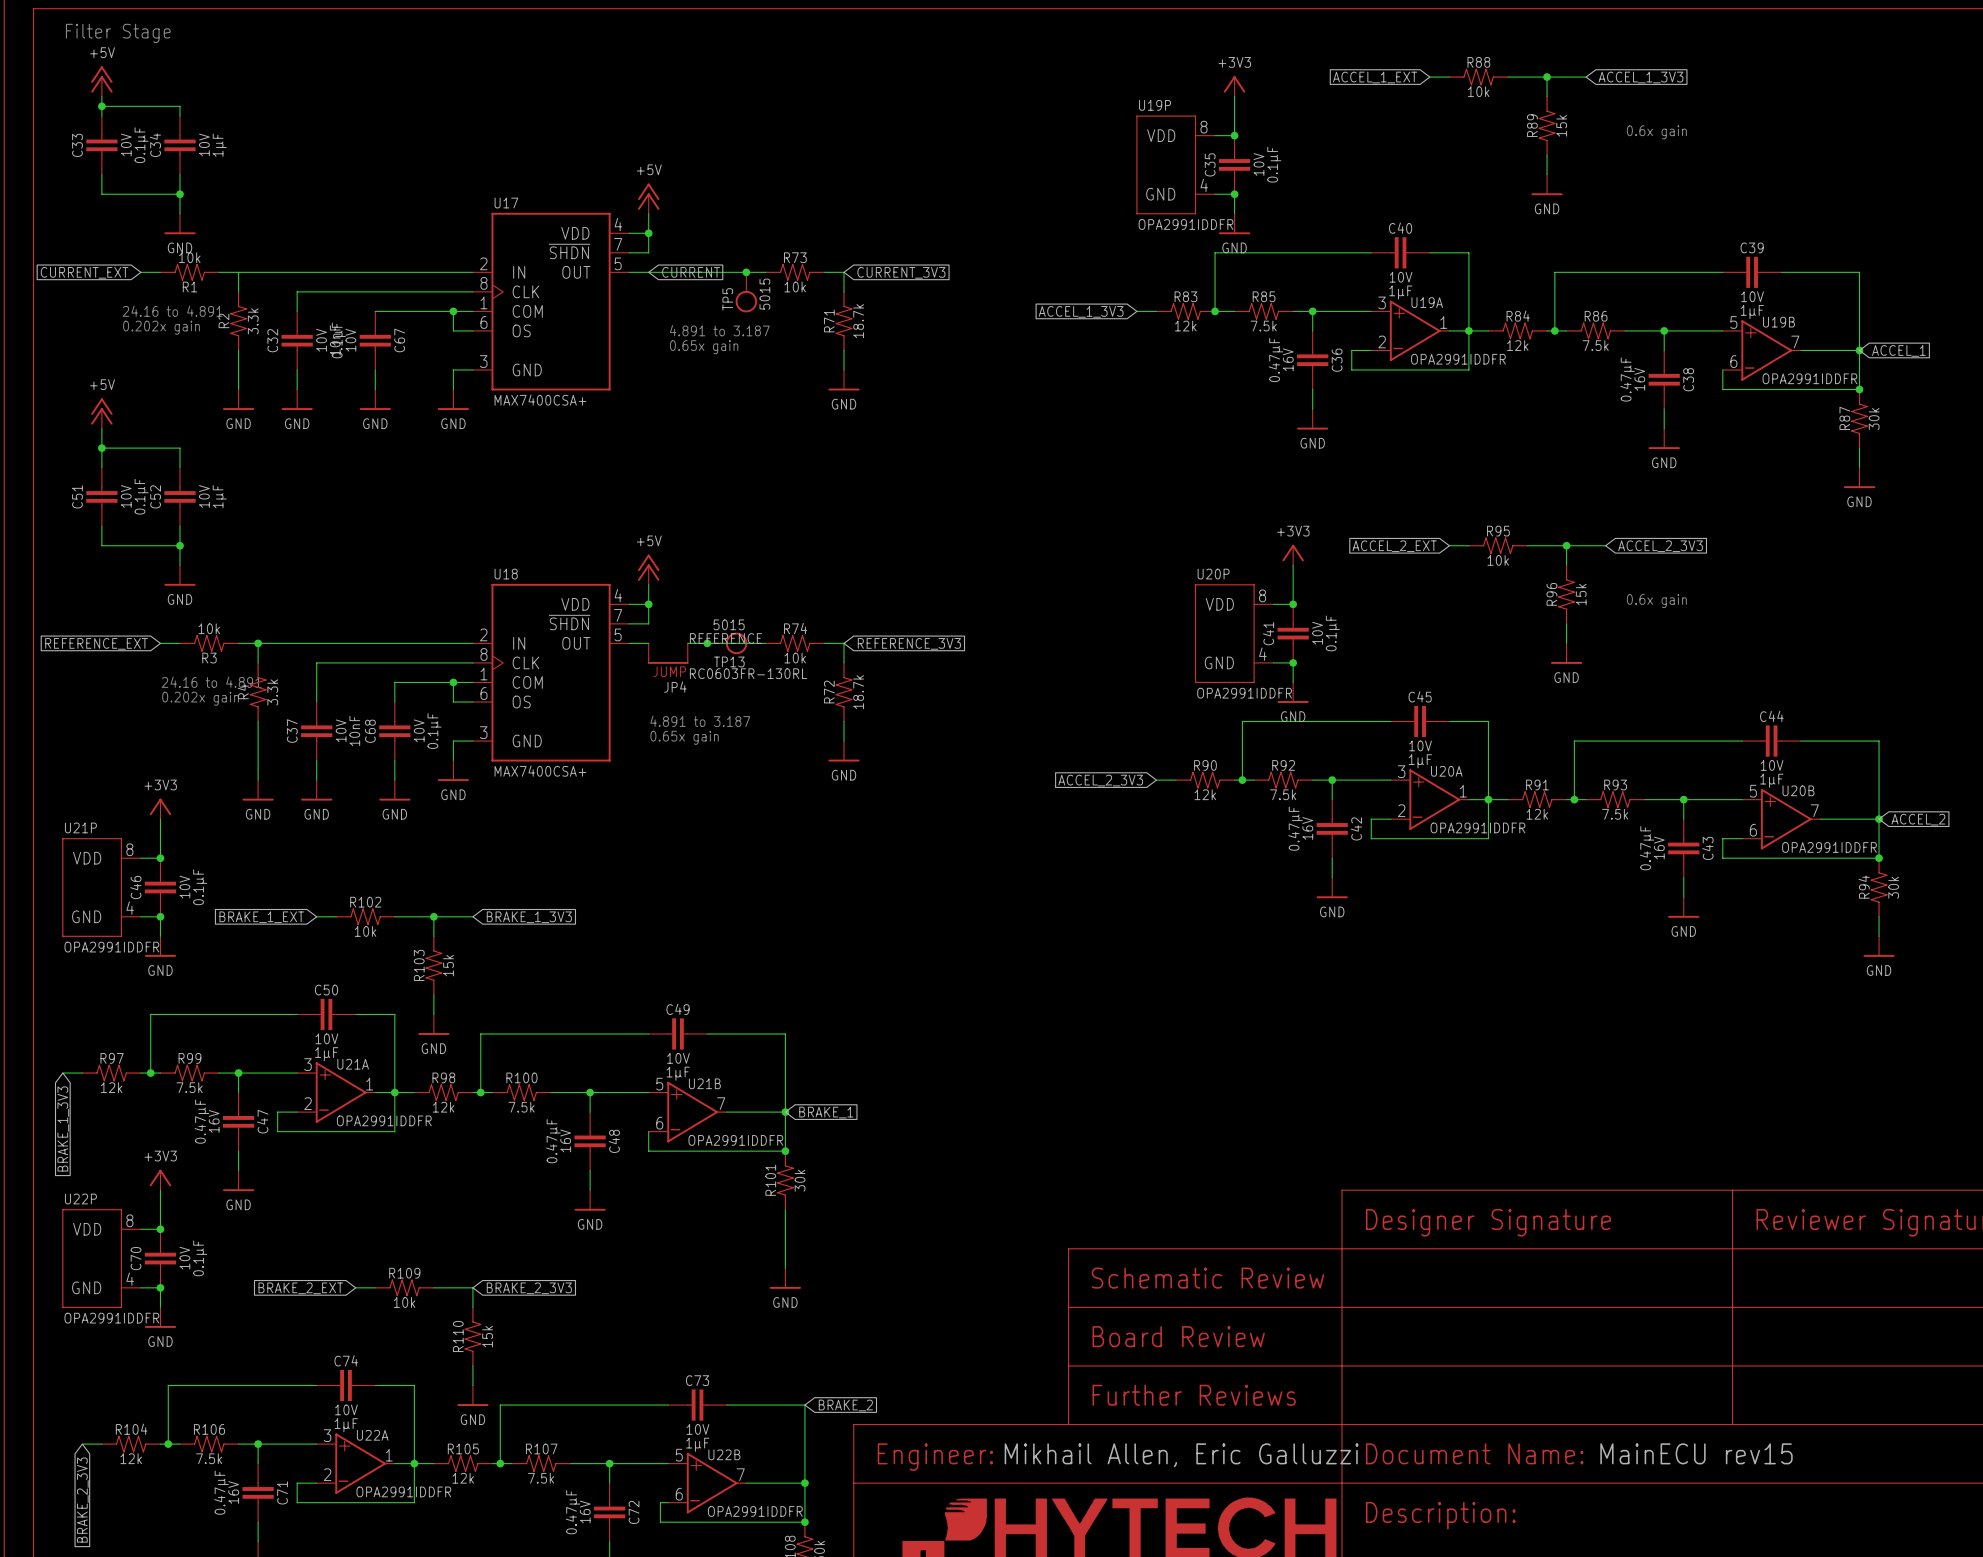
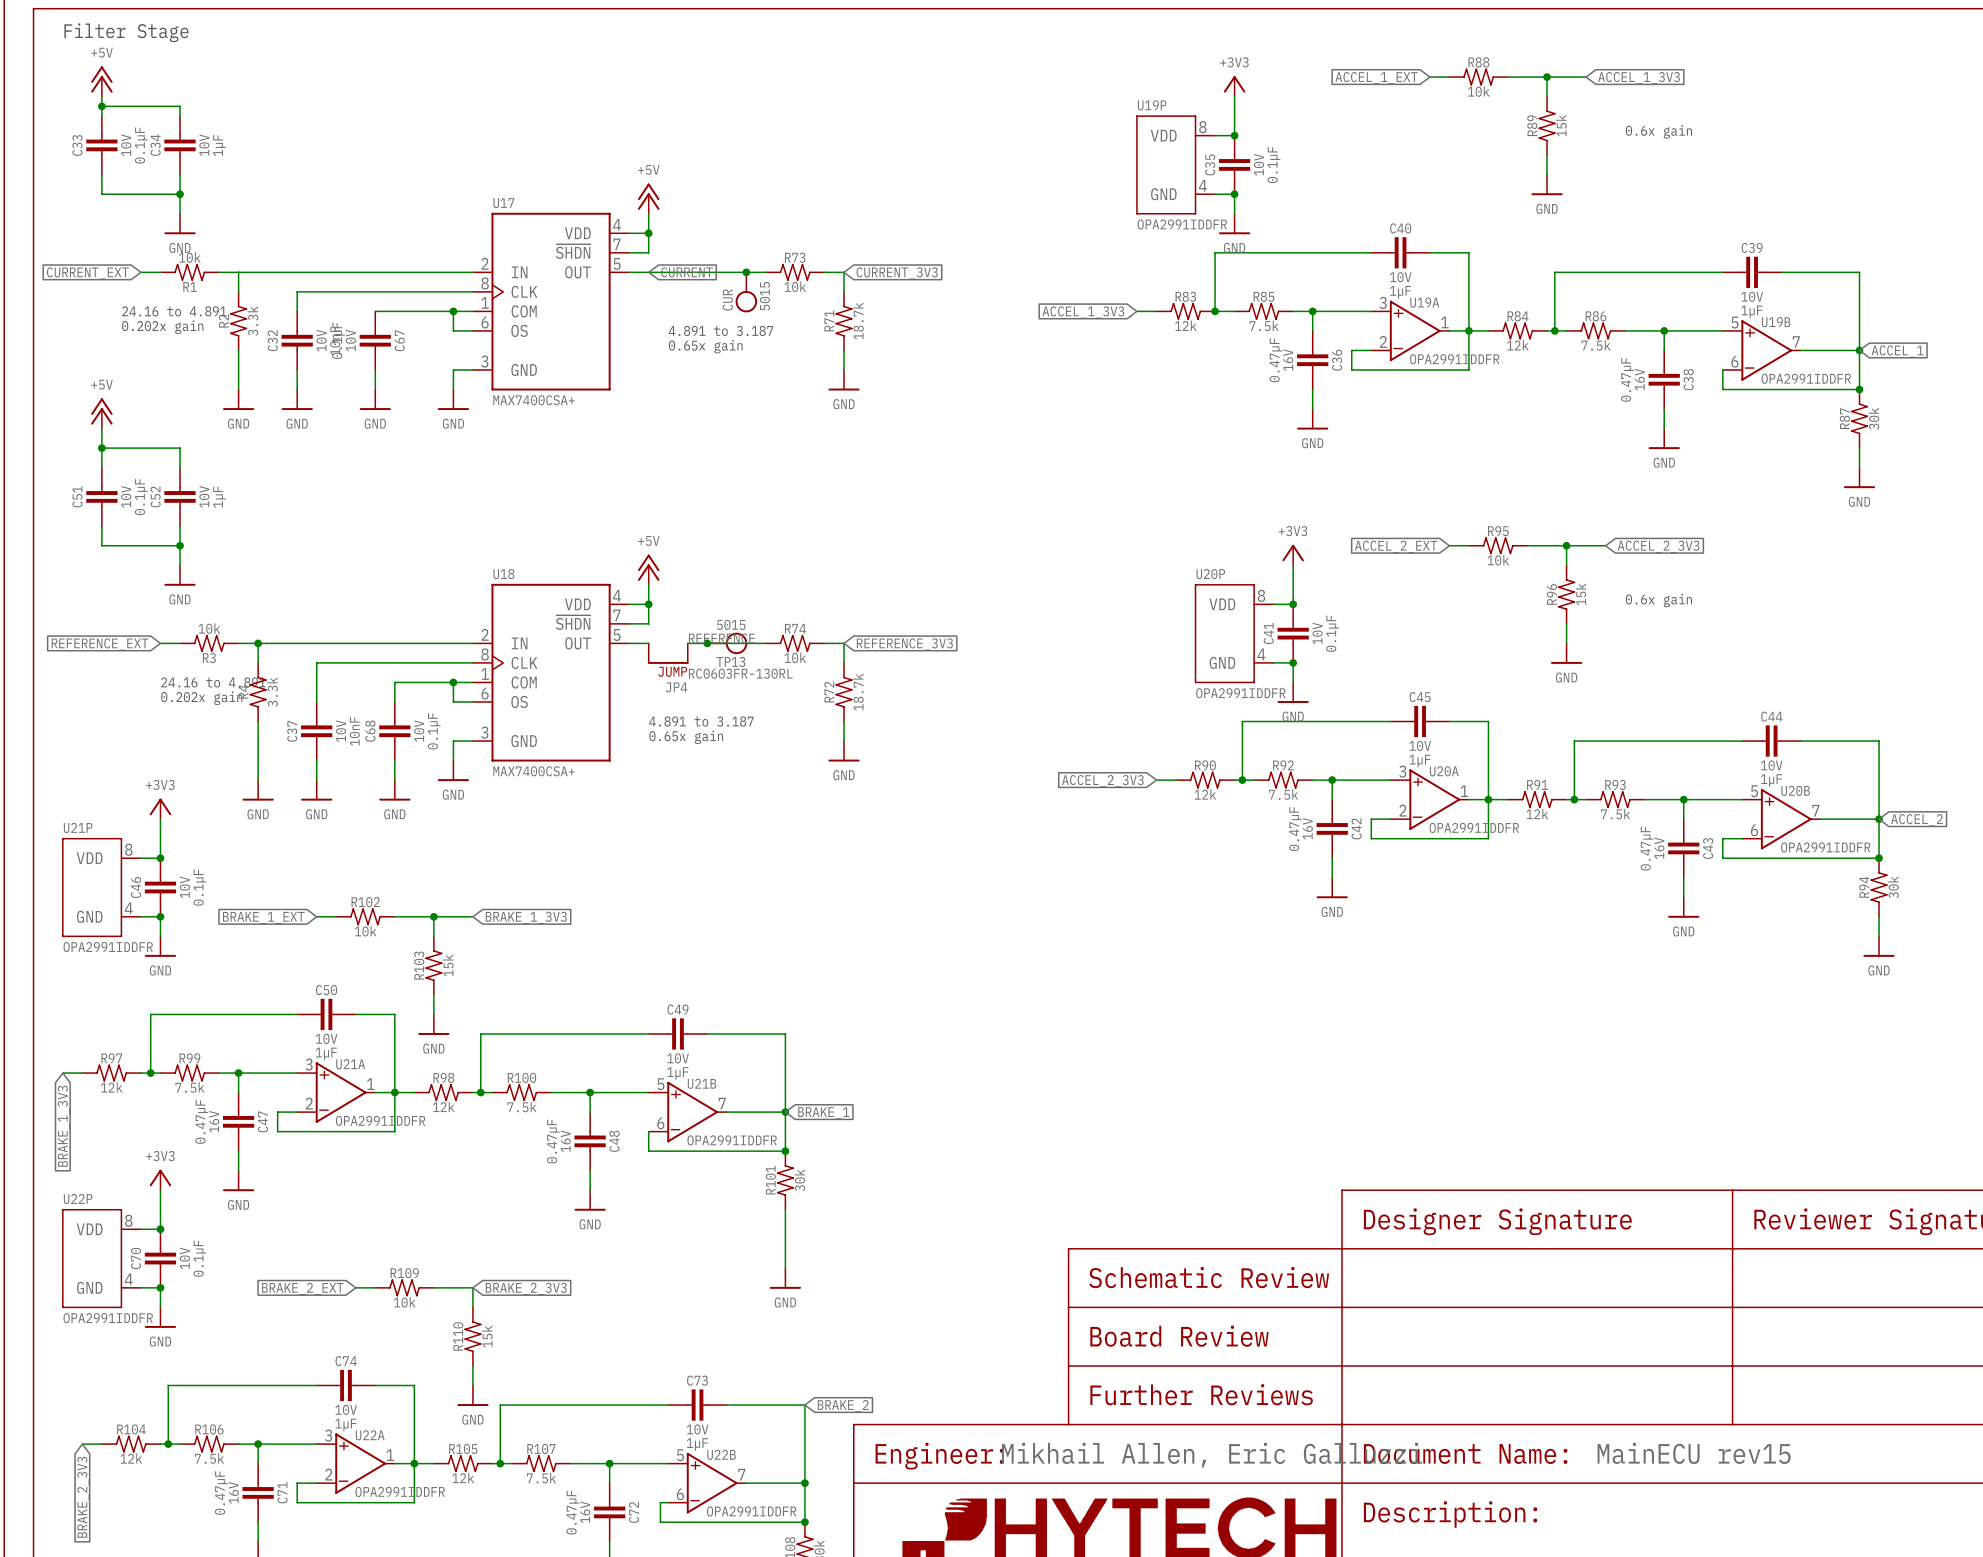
TP5 name: TP5 (727, 299) -> CUR (727, 299)

